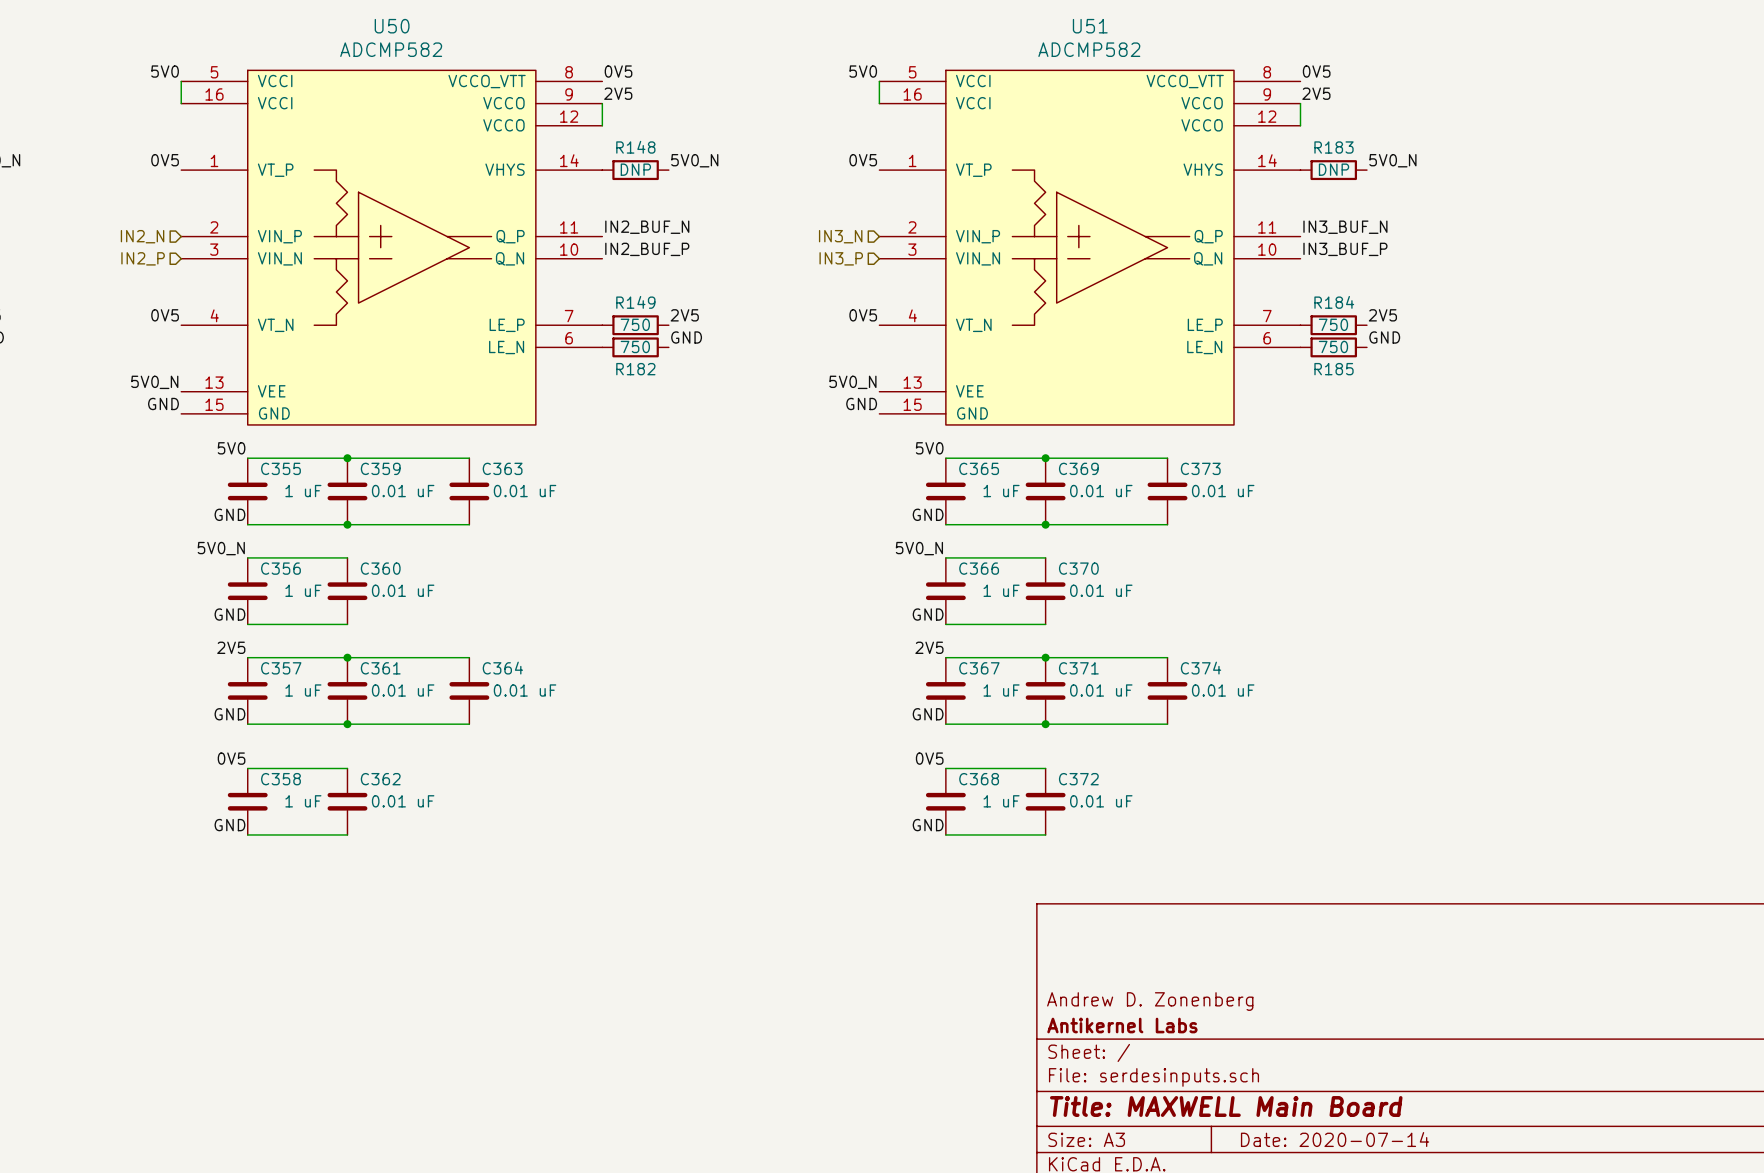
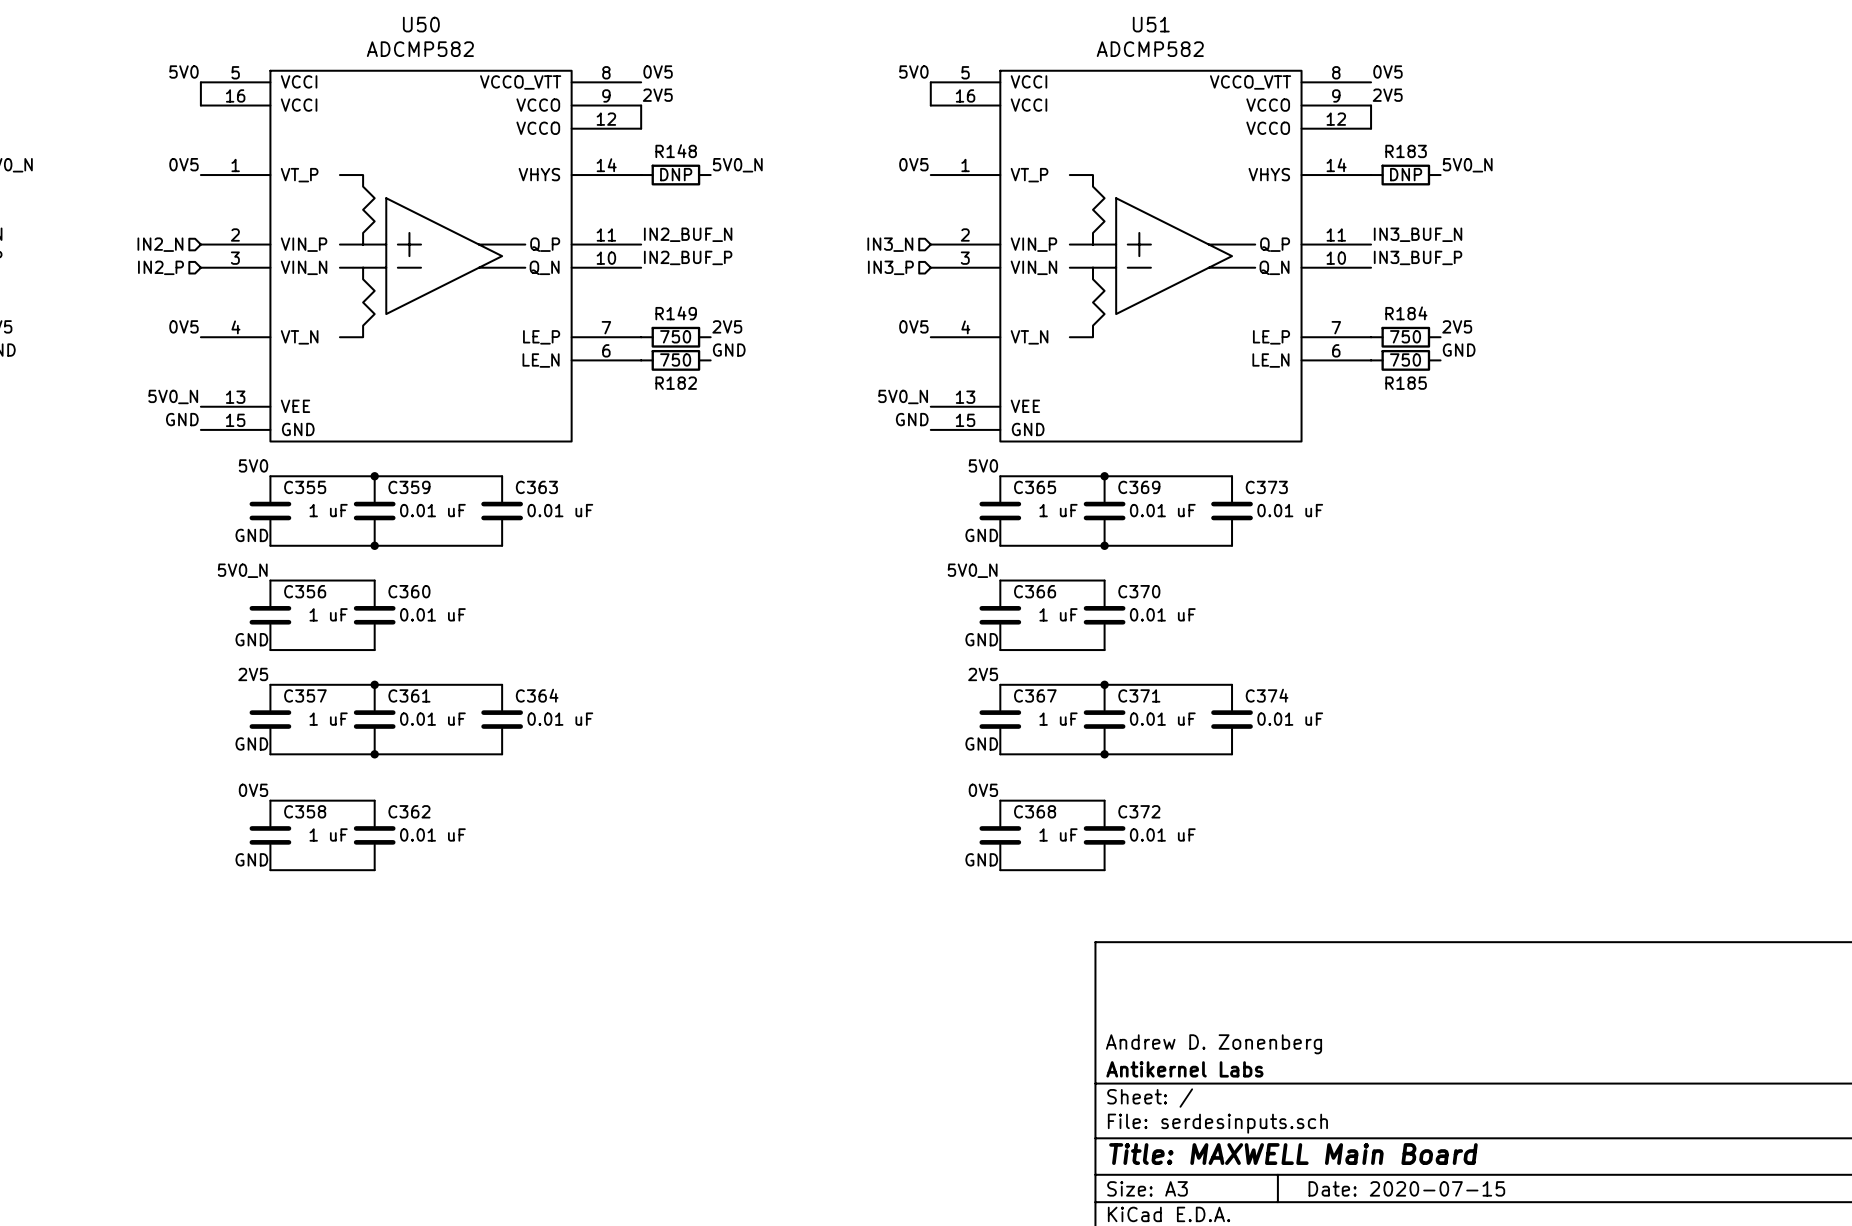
title block: Date: 2020-07-14 (1335, 1139) -> Date: 2020-07-15 (1406, 1188)

